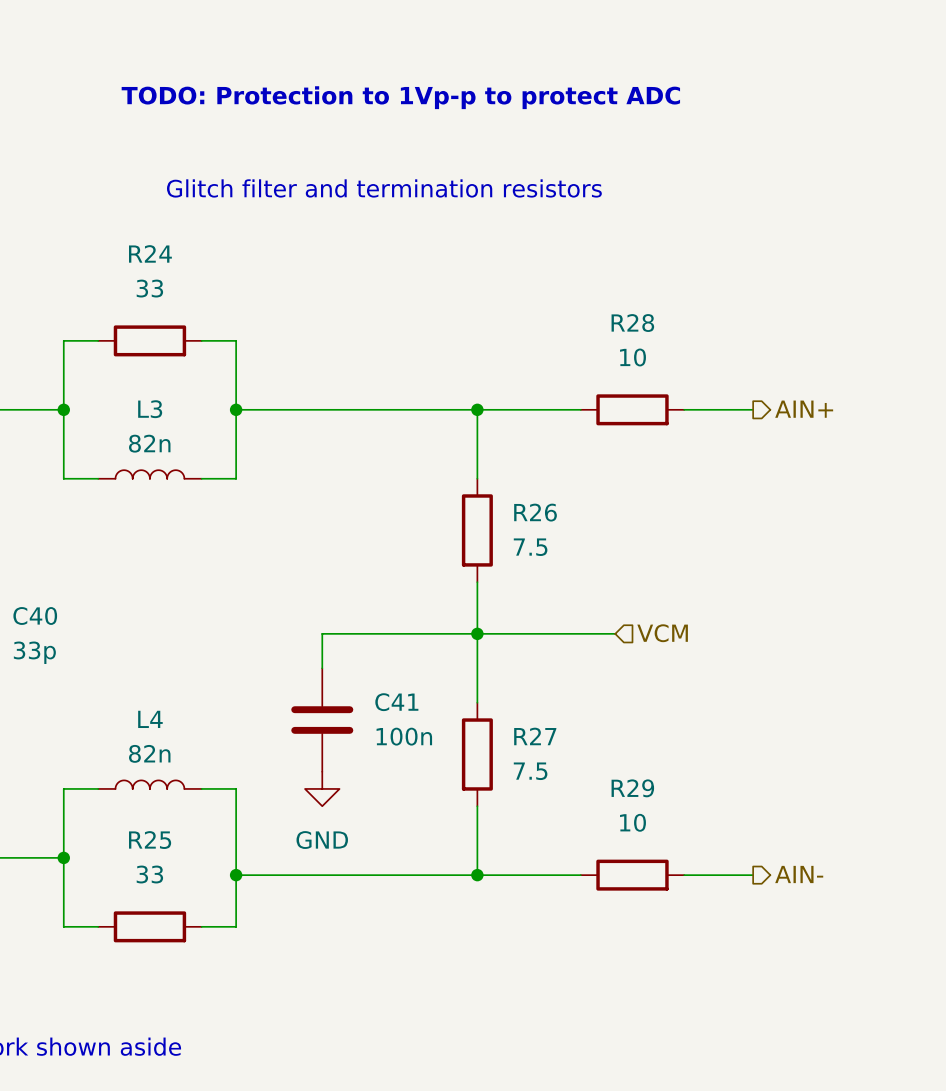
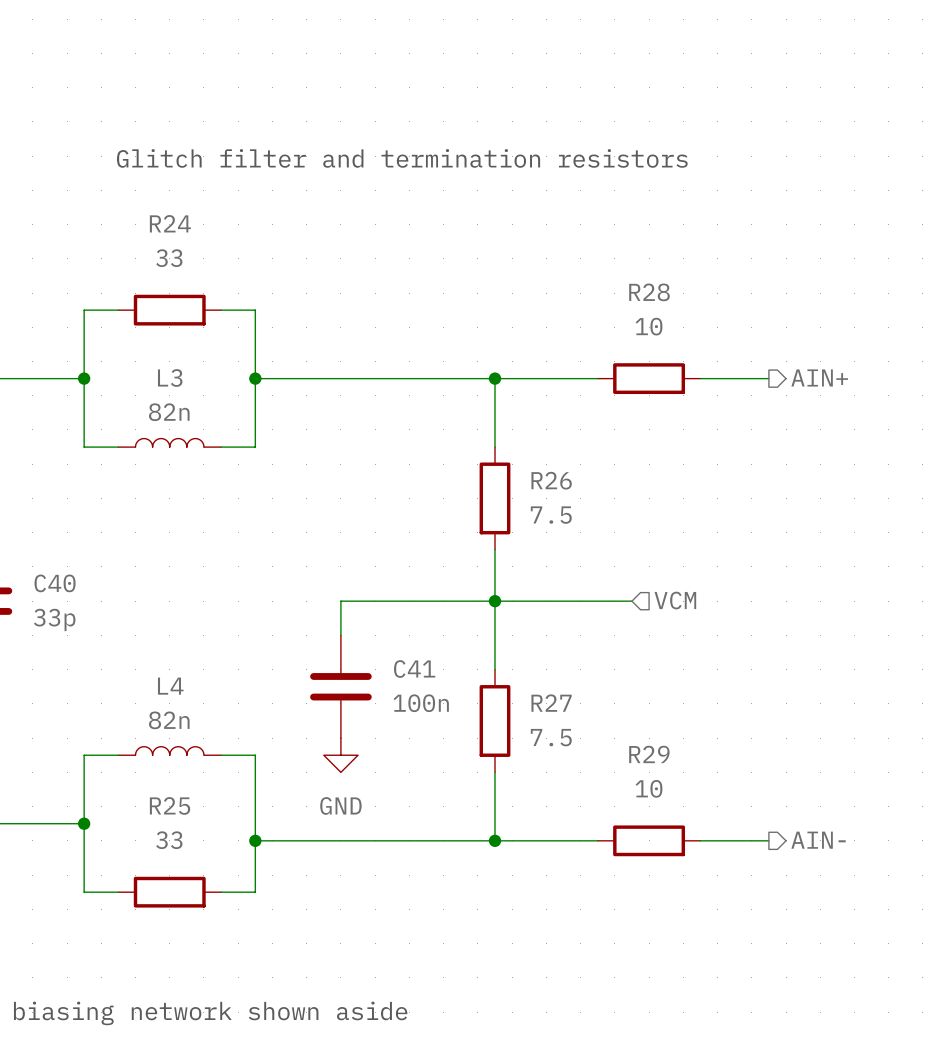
text: TODO: Protection to 1Vp-p to protect ADC (400, 97) -> none

